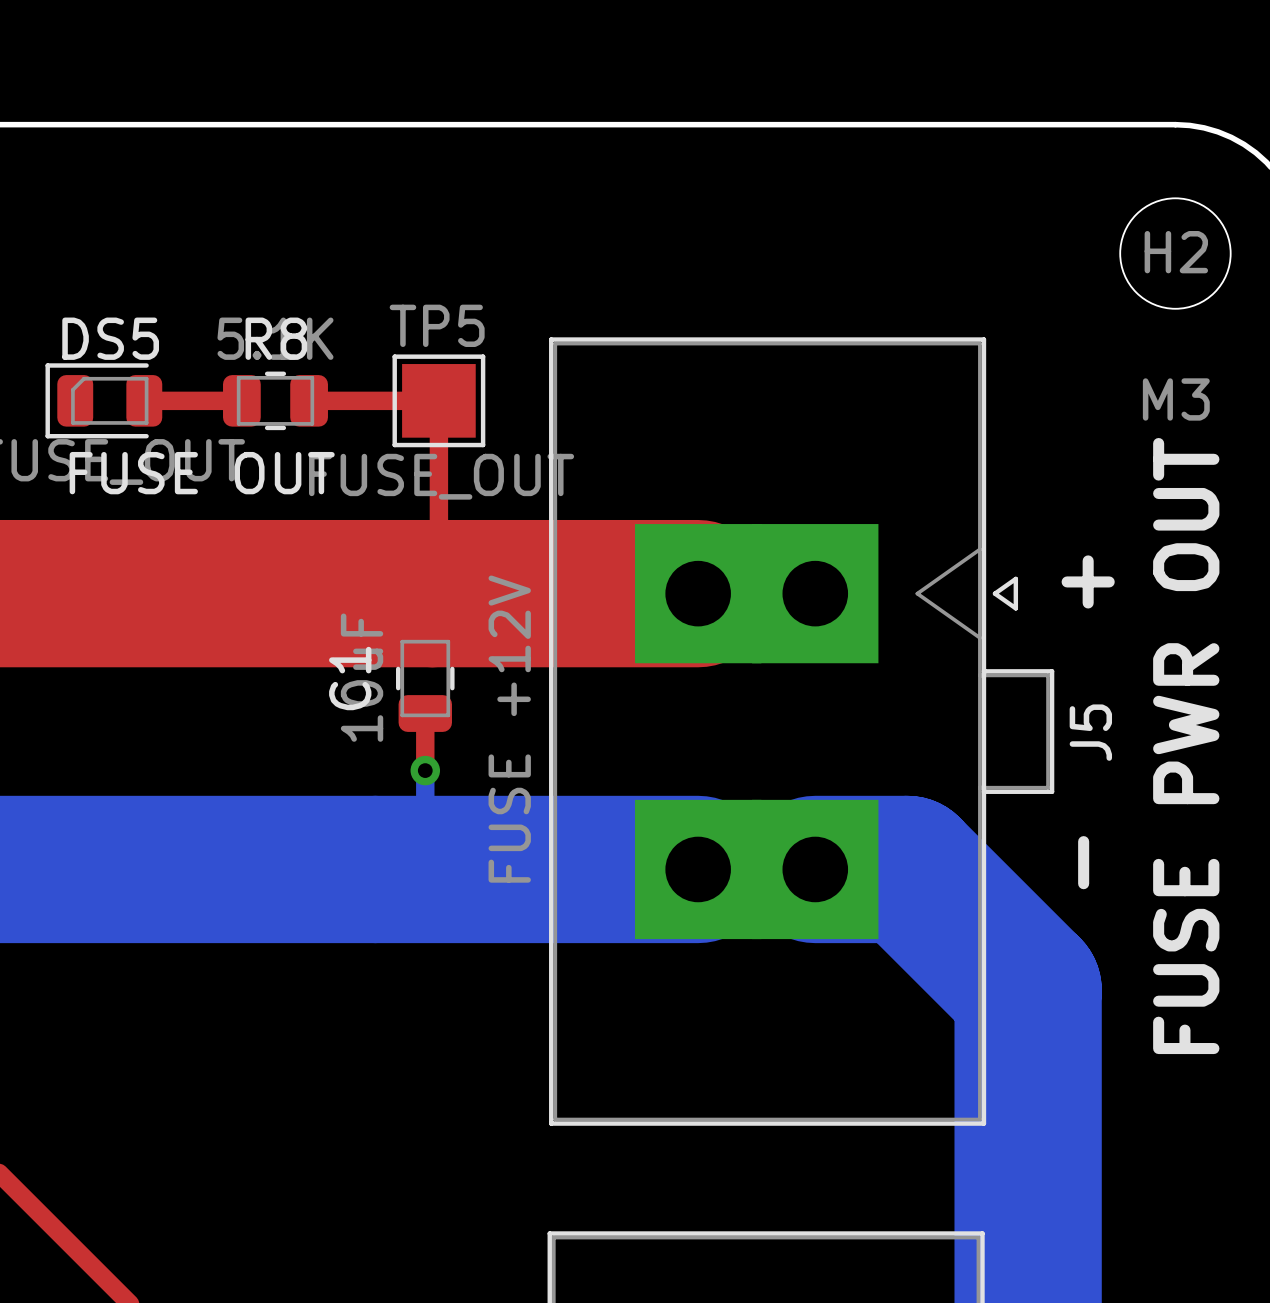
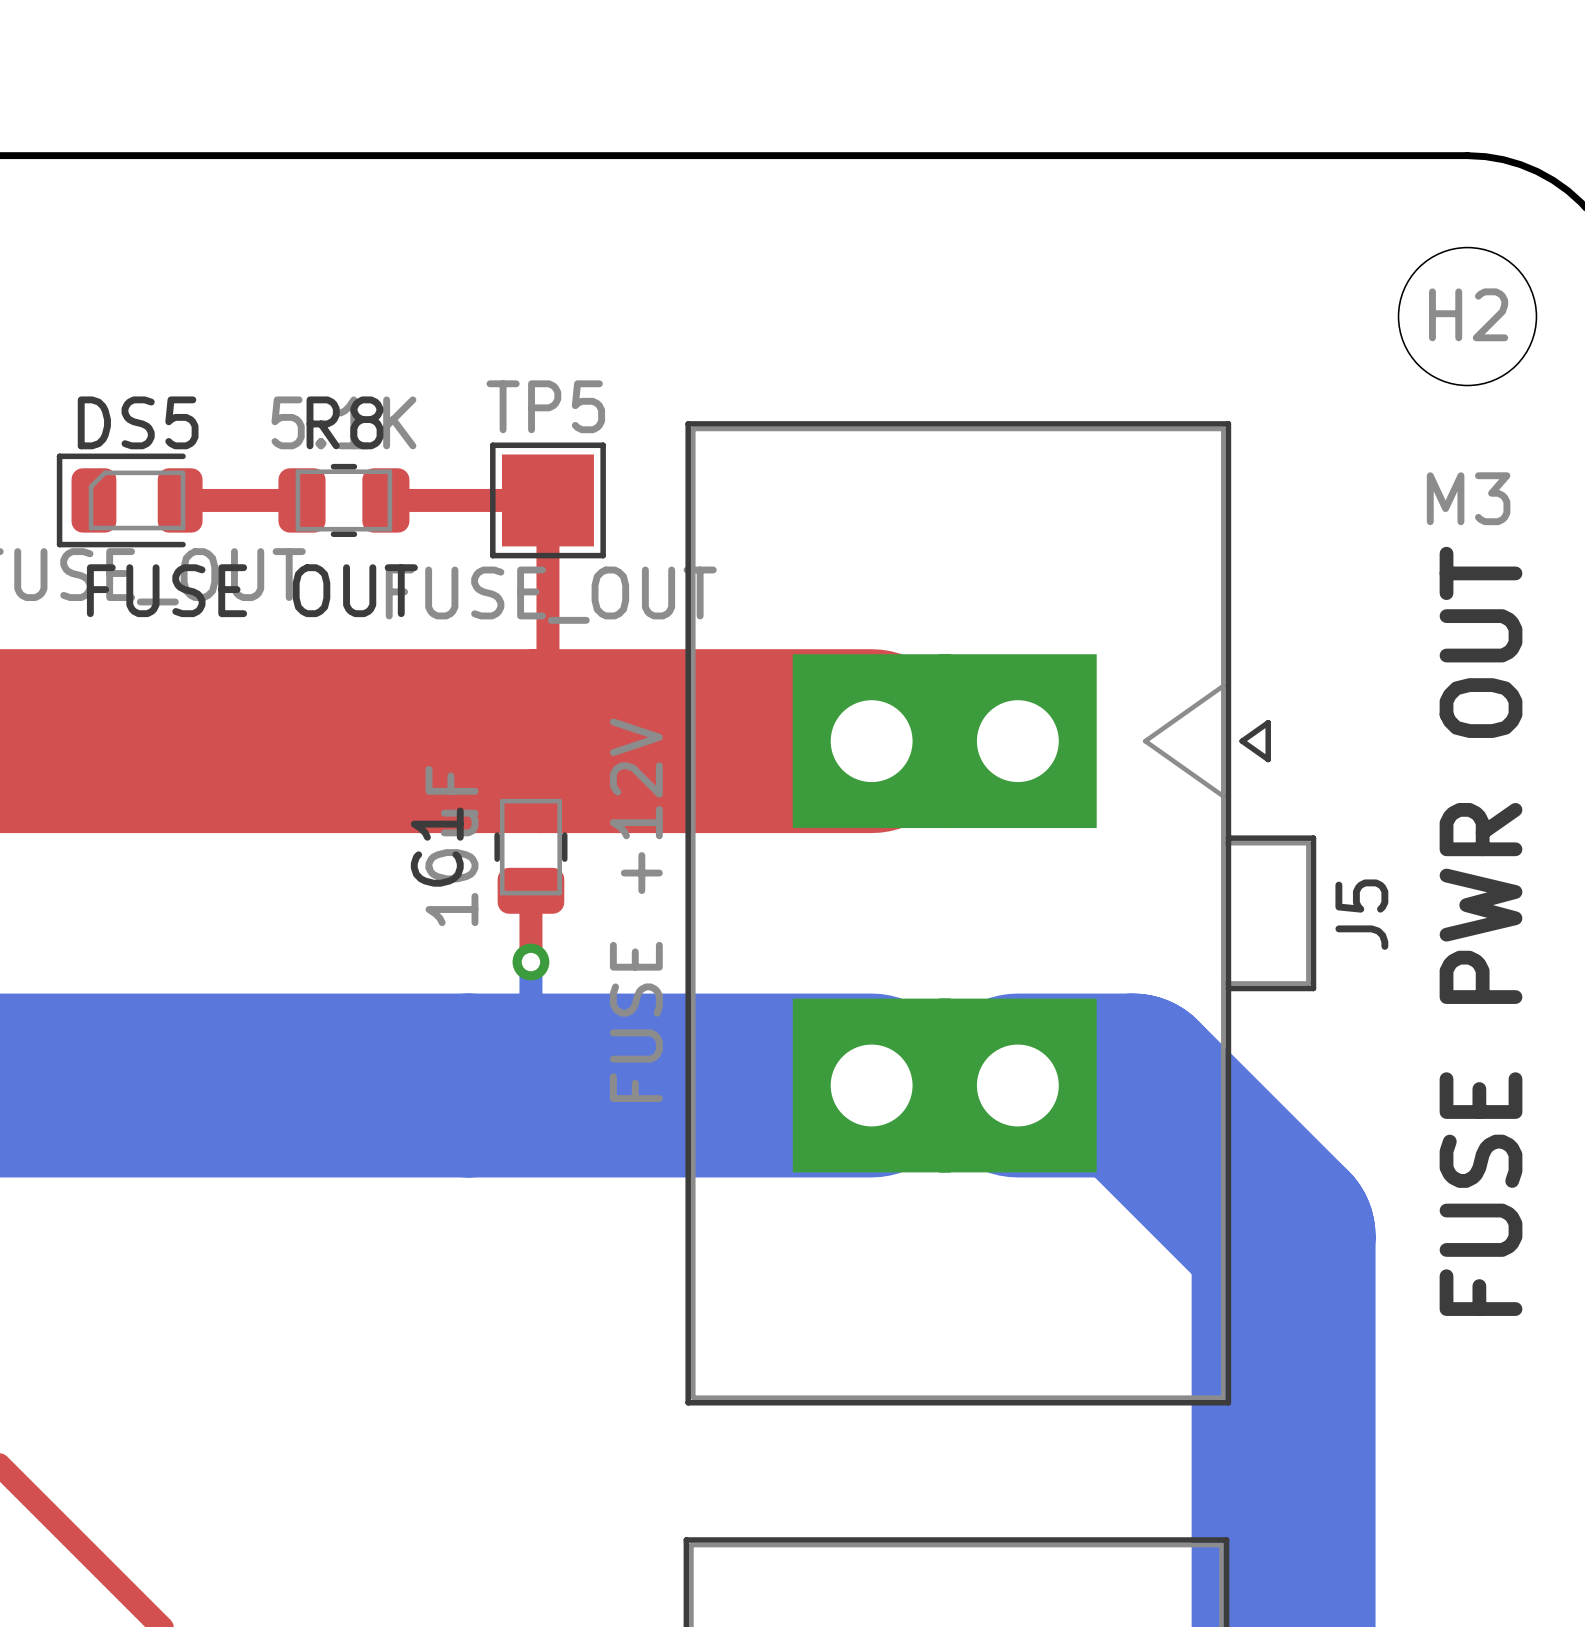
text: + (1088, 581) -> none
text: - (1083, 862) -> none

